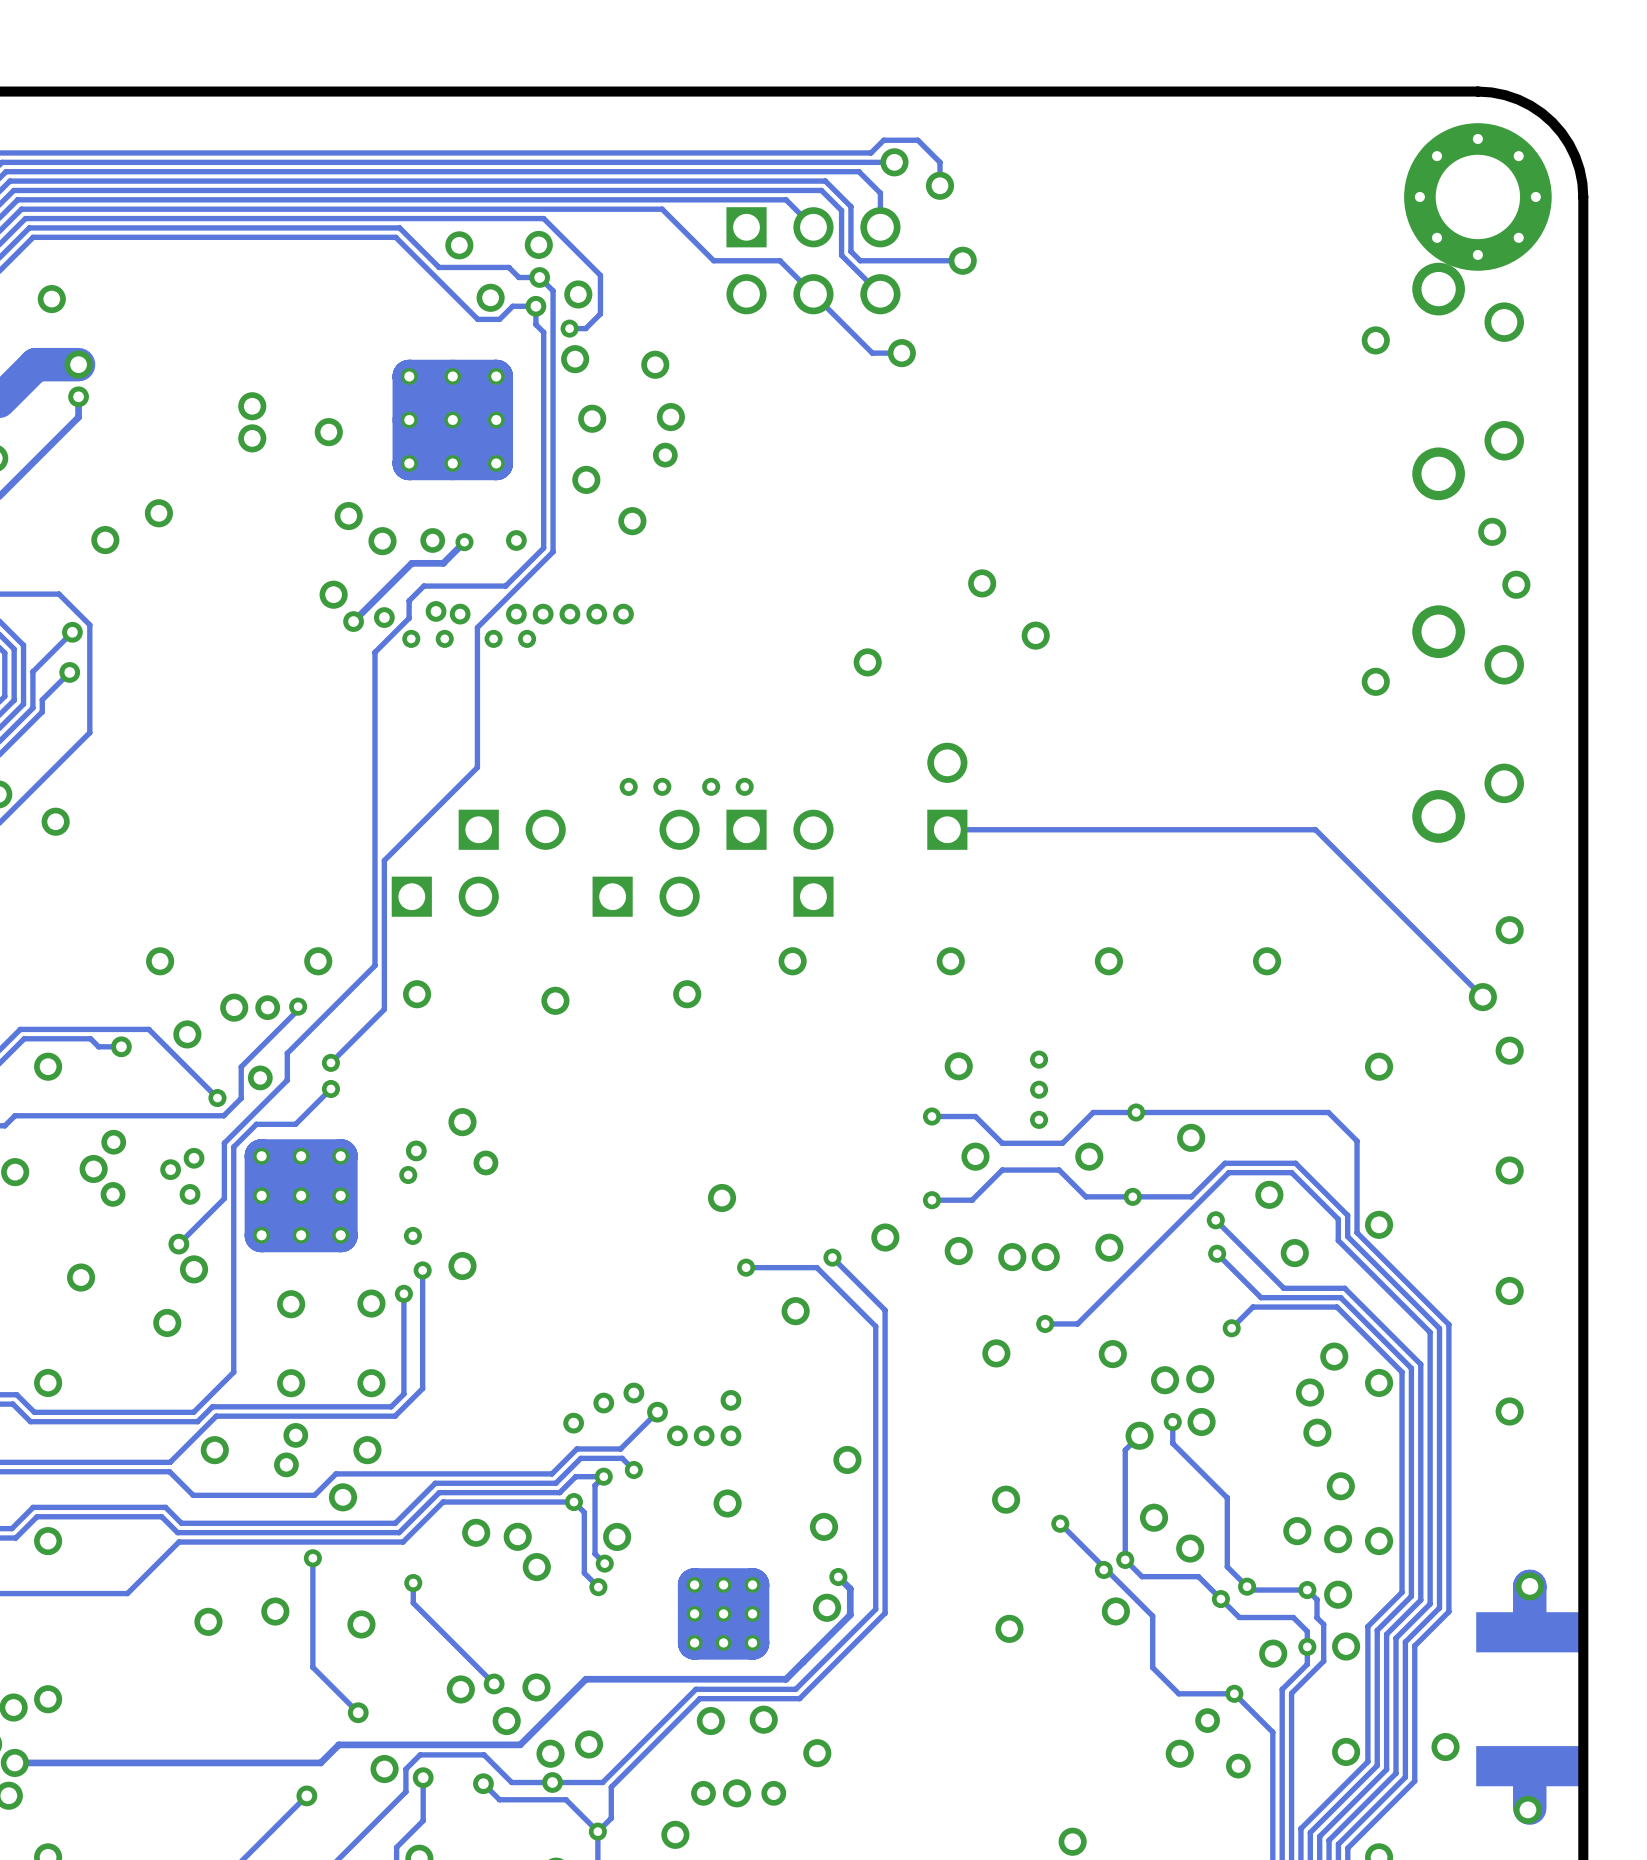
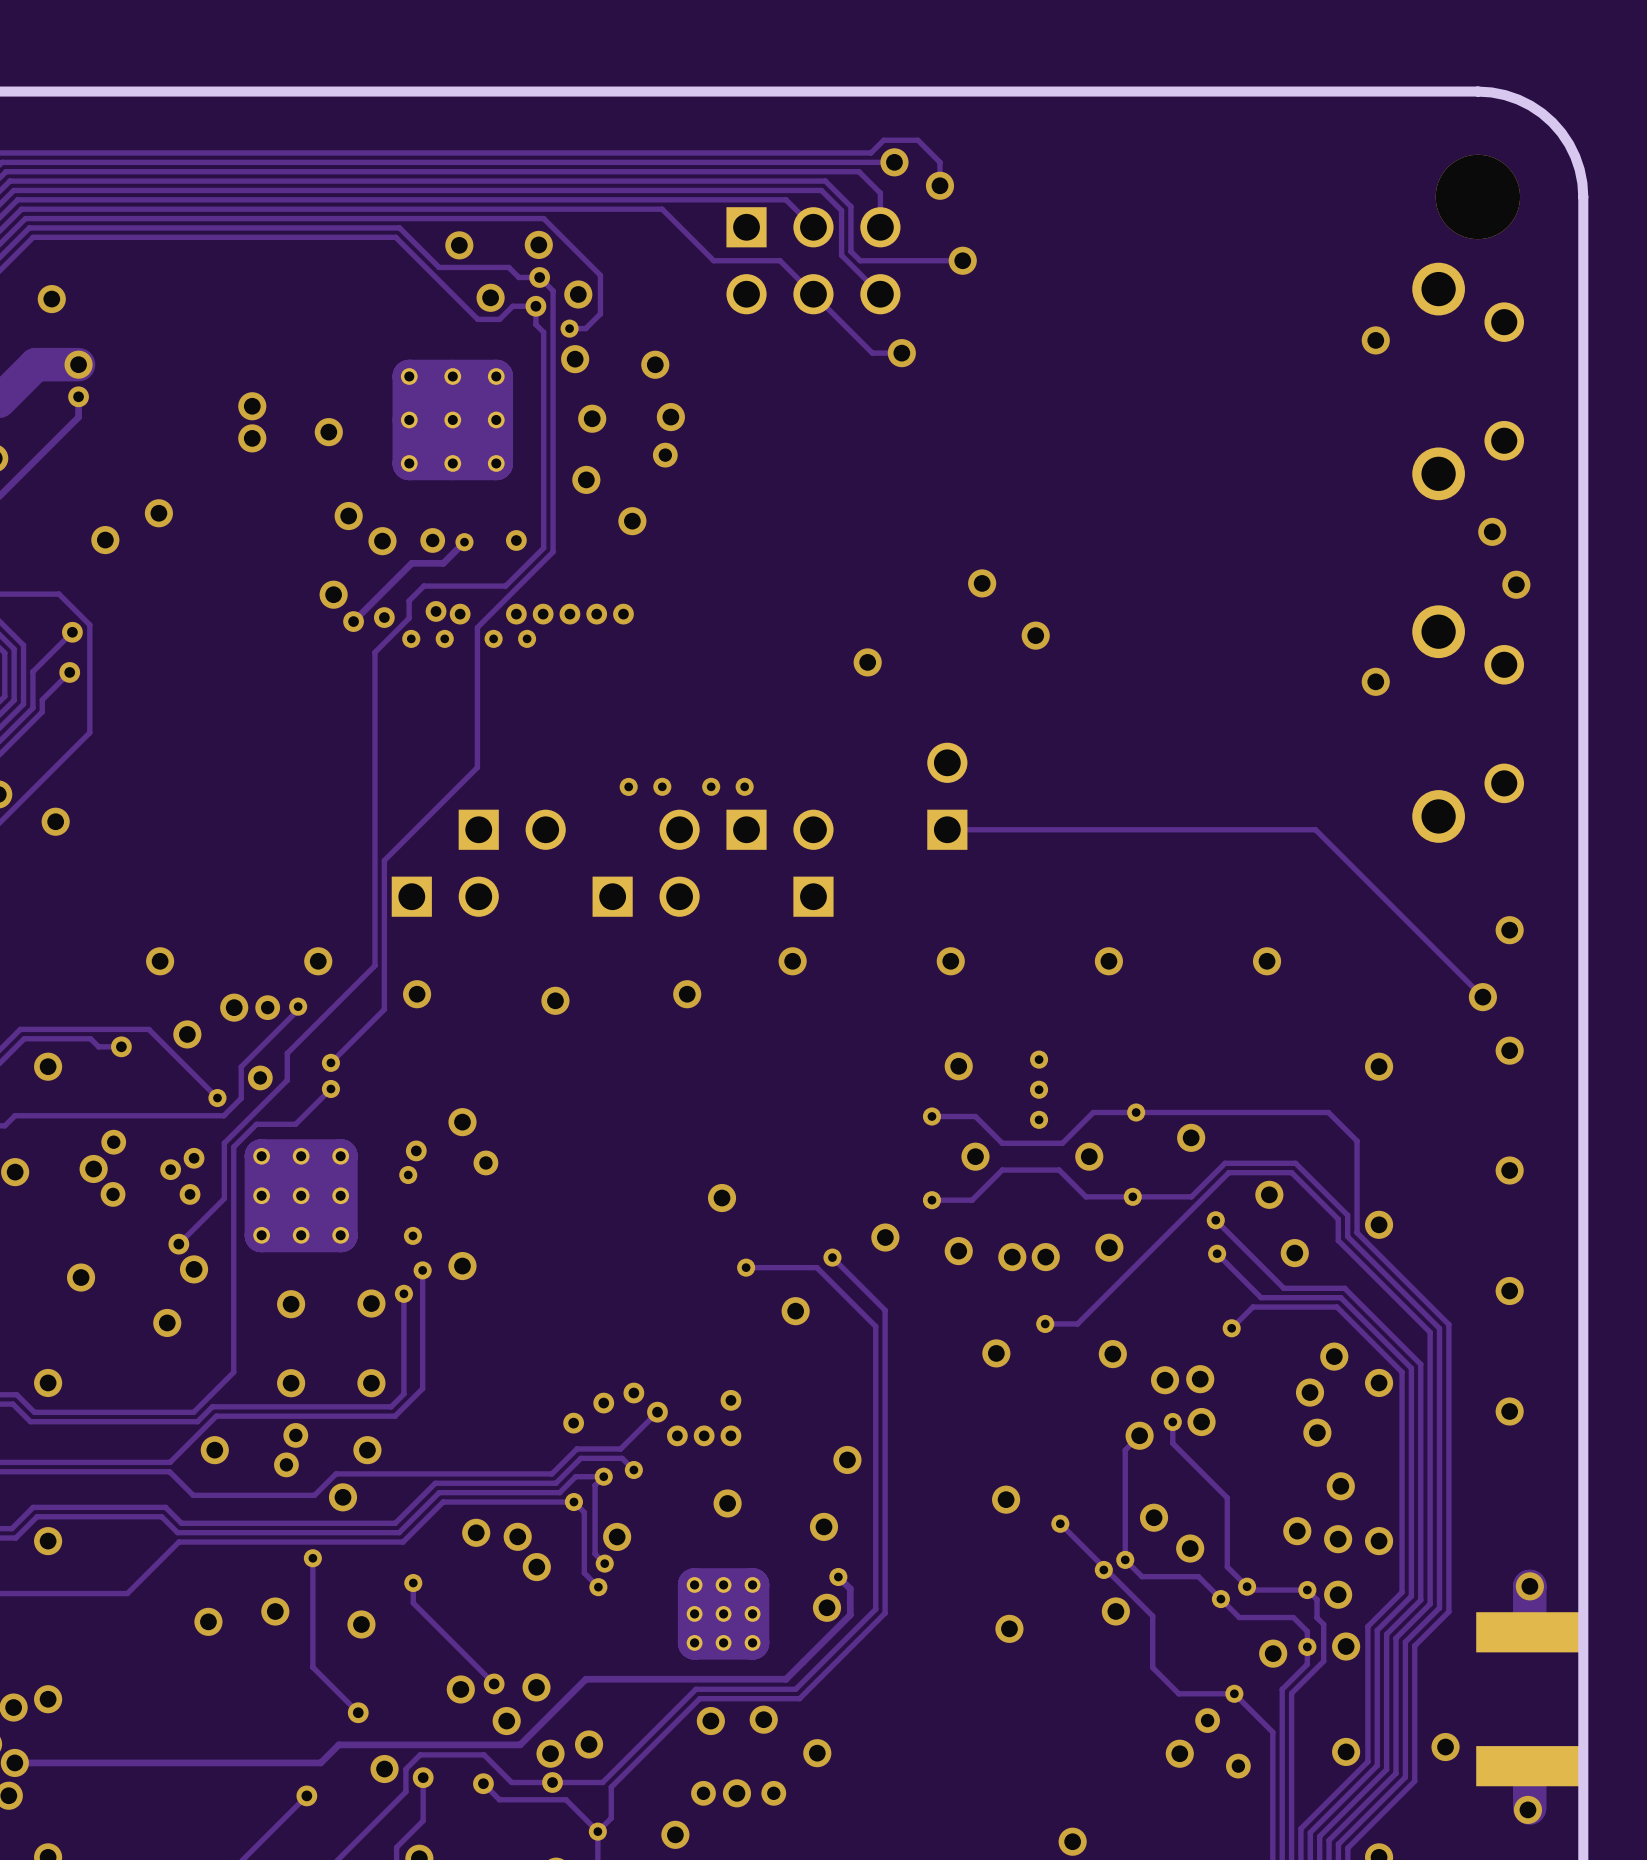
part footprint: [1404, 123, 1552, 271] -> [1435, 154, 1521, 240]

